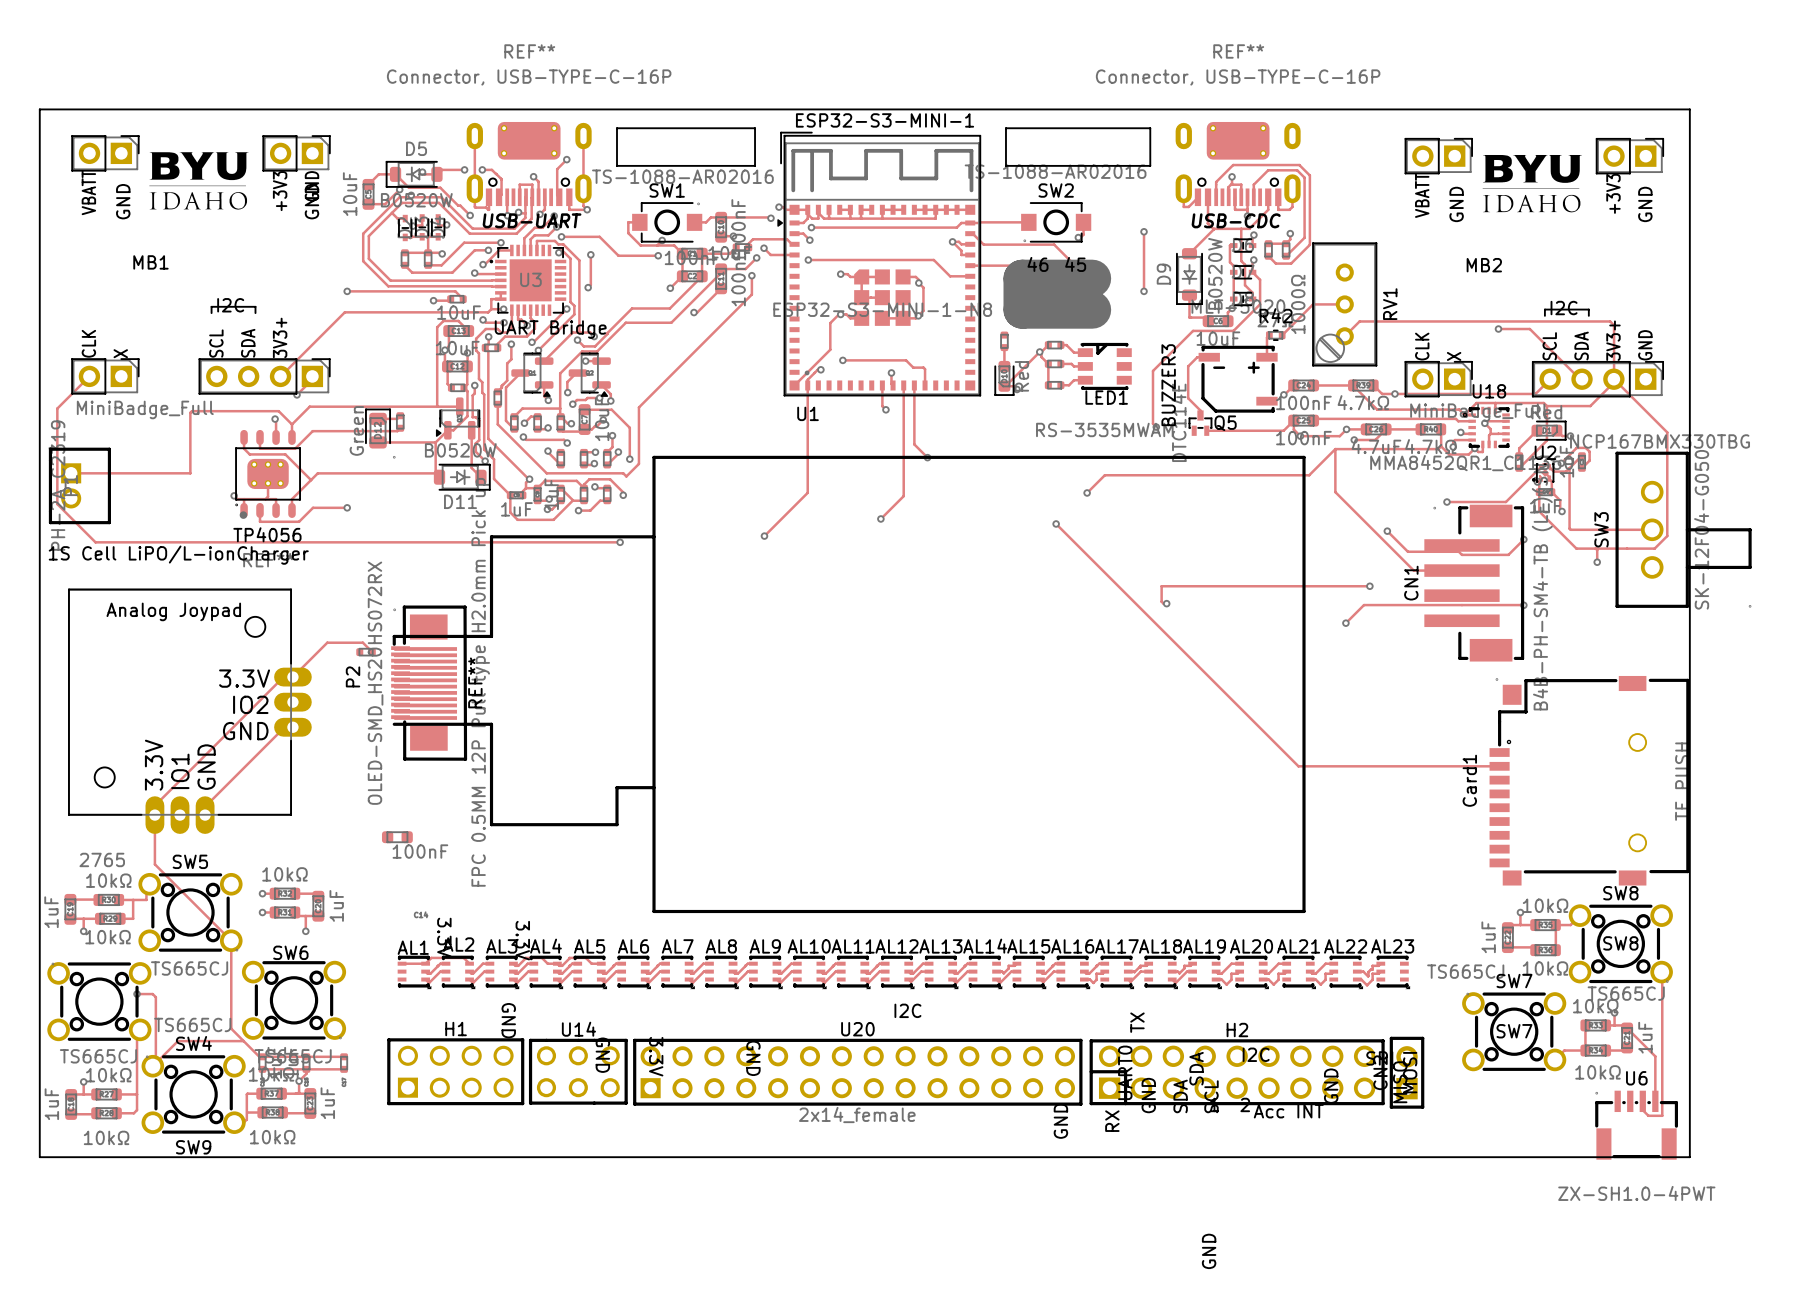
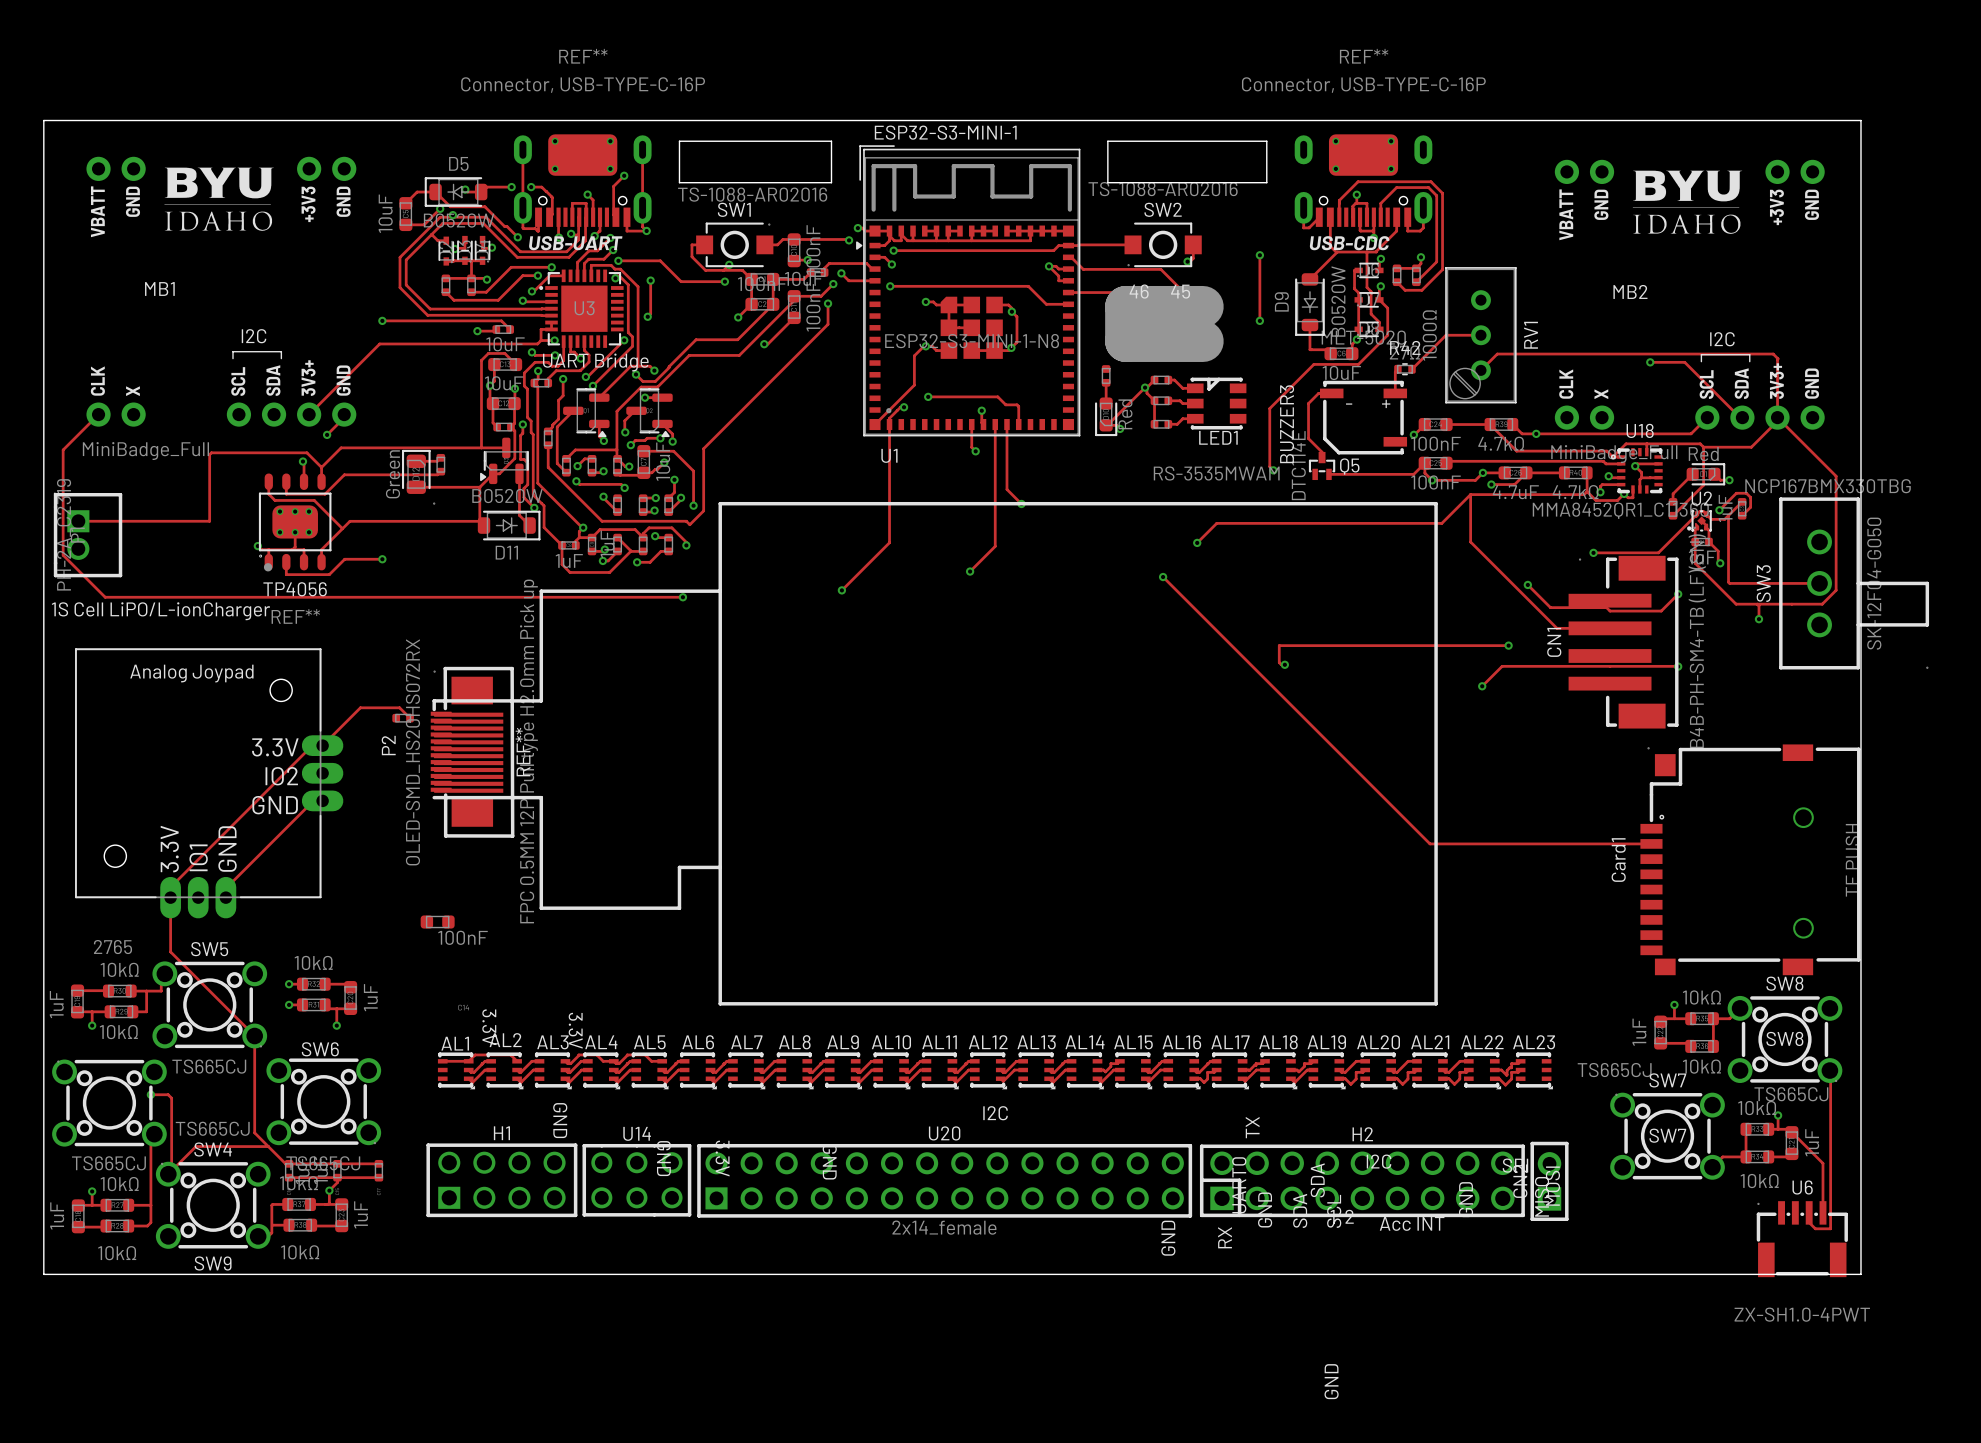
MB1 footprint: [71, 135, 331, 395] -> [86, 156, 357, 427]
MB2 footprint: [1404, 138, 1664, 398] -> [1554, 159, 1825, 430]

